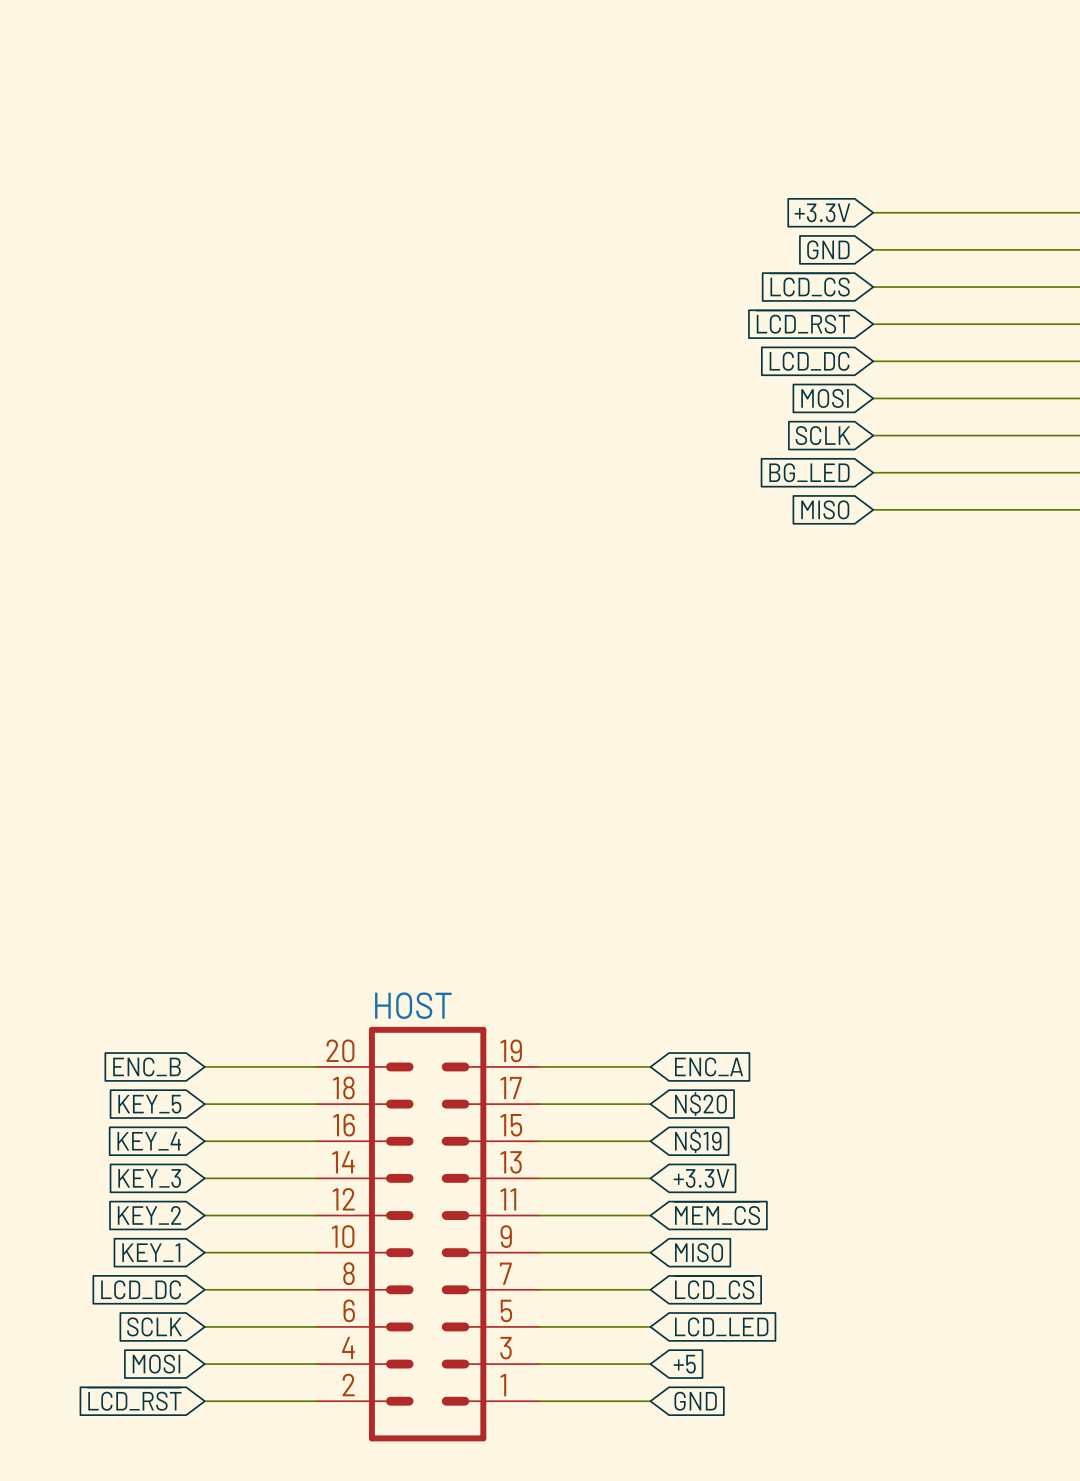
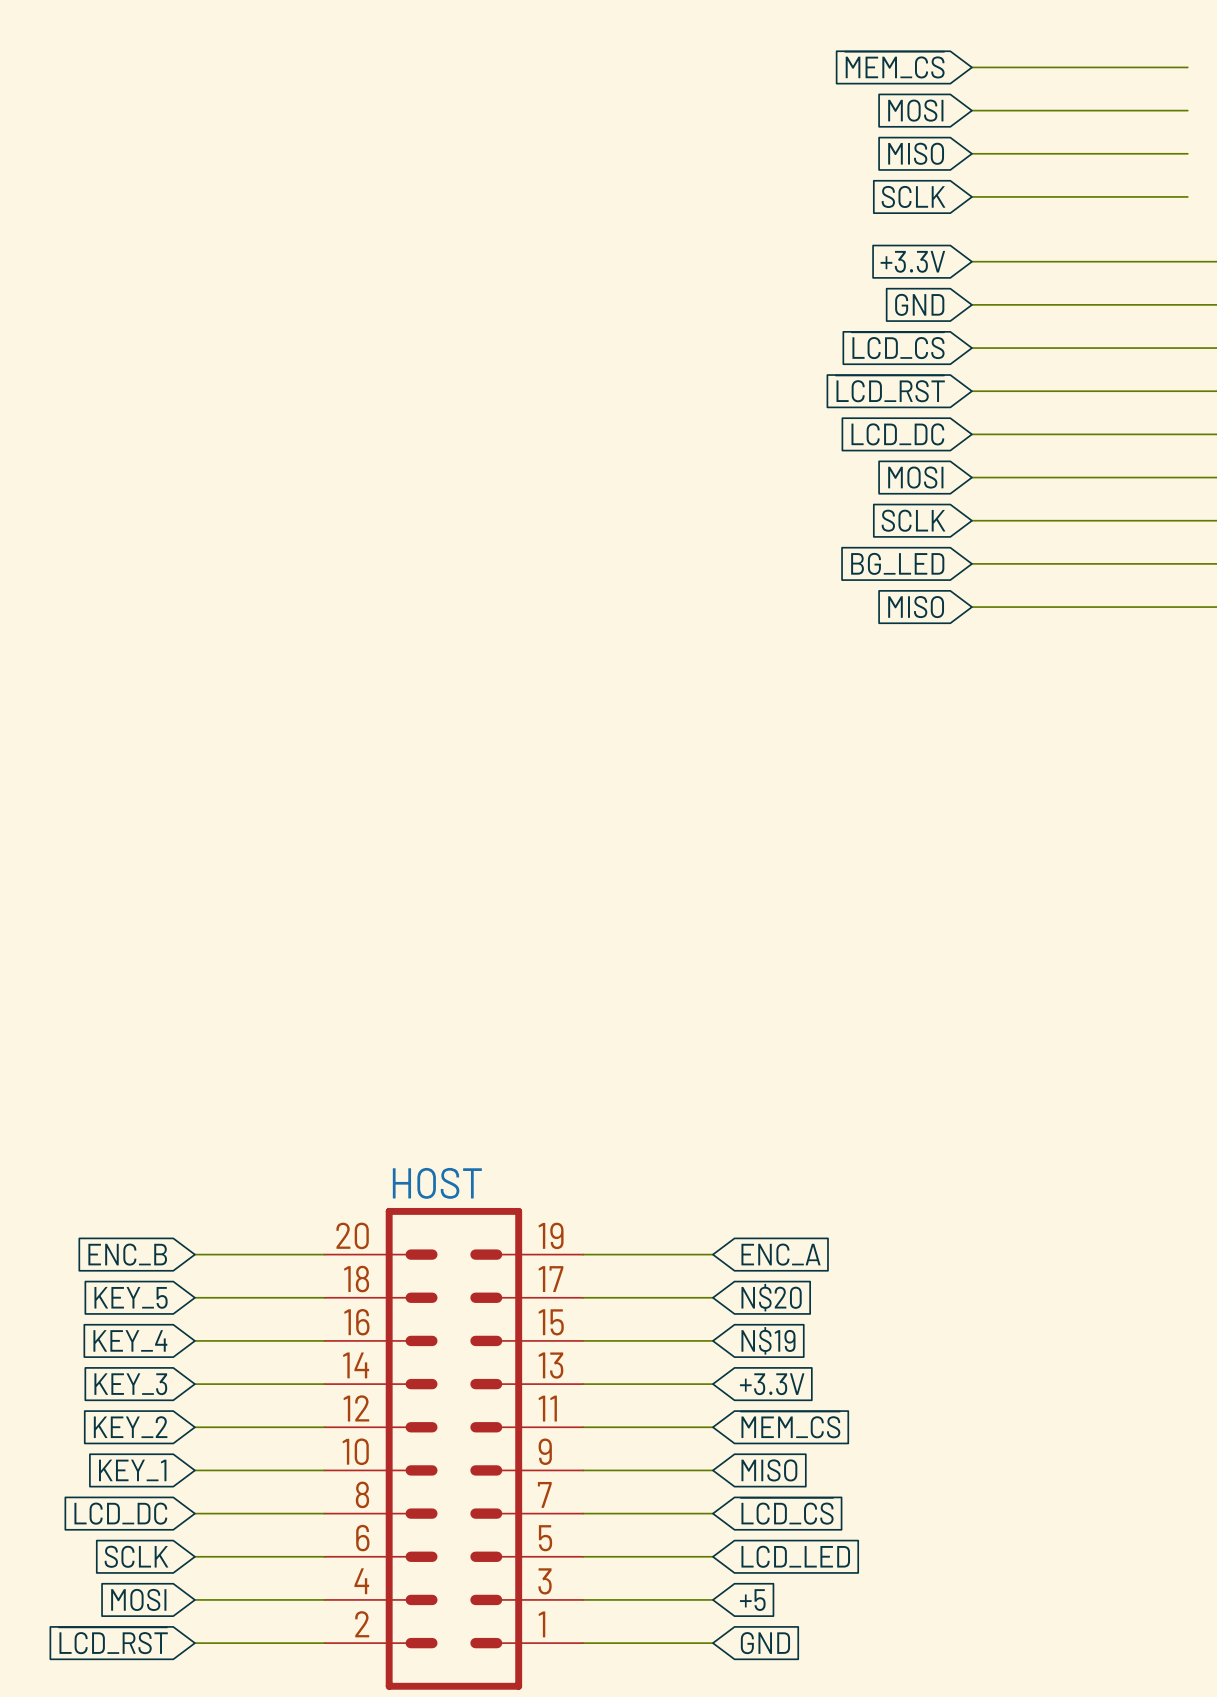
global label: none -> ~{MEM_CS} (894, 65)
wire: none -> (971, 67) (1187, 67)
global label: none -> MOSI (915, 110)
wire: none -> (971, 110) (1187, 110)
global label: none -> MISO (916, 153)
wire: none -> (971, 153) (1187, 153)
global label: none -> SCLK (913, 196)
wire: none -> (971, 196) (1187, 196)

